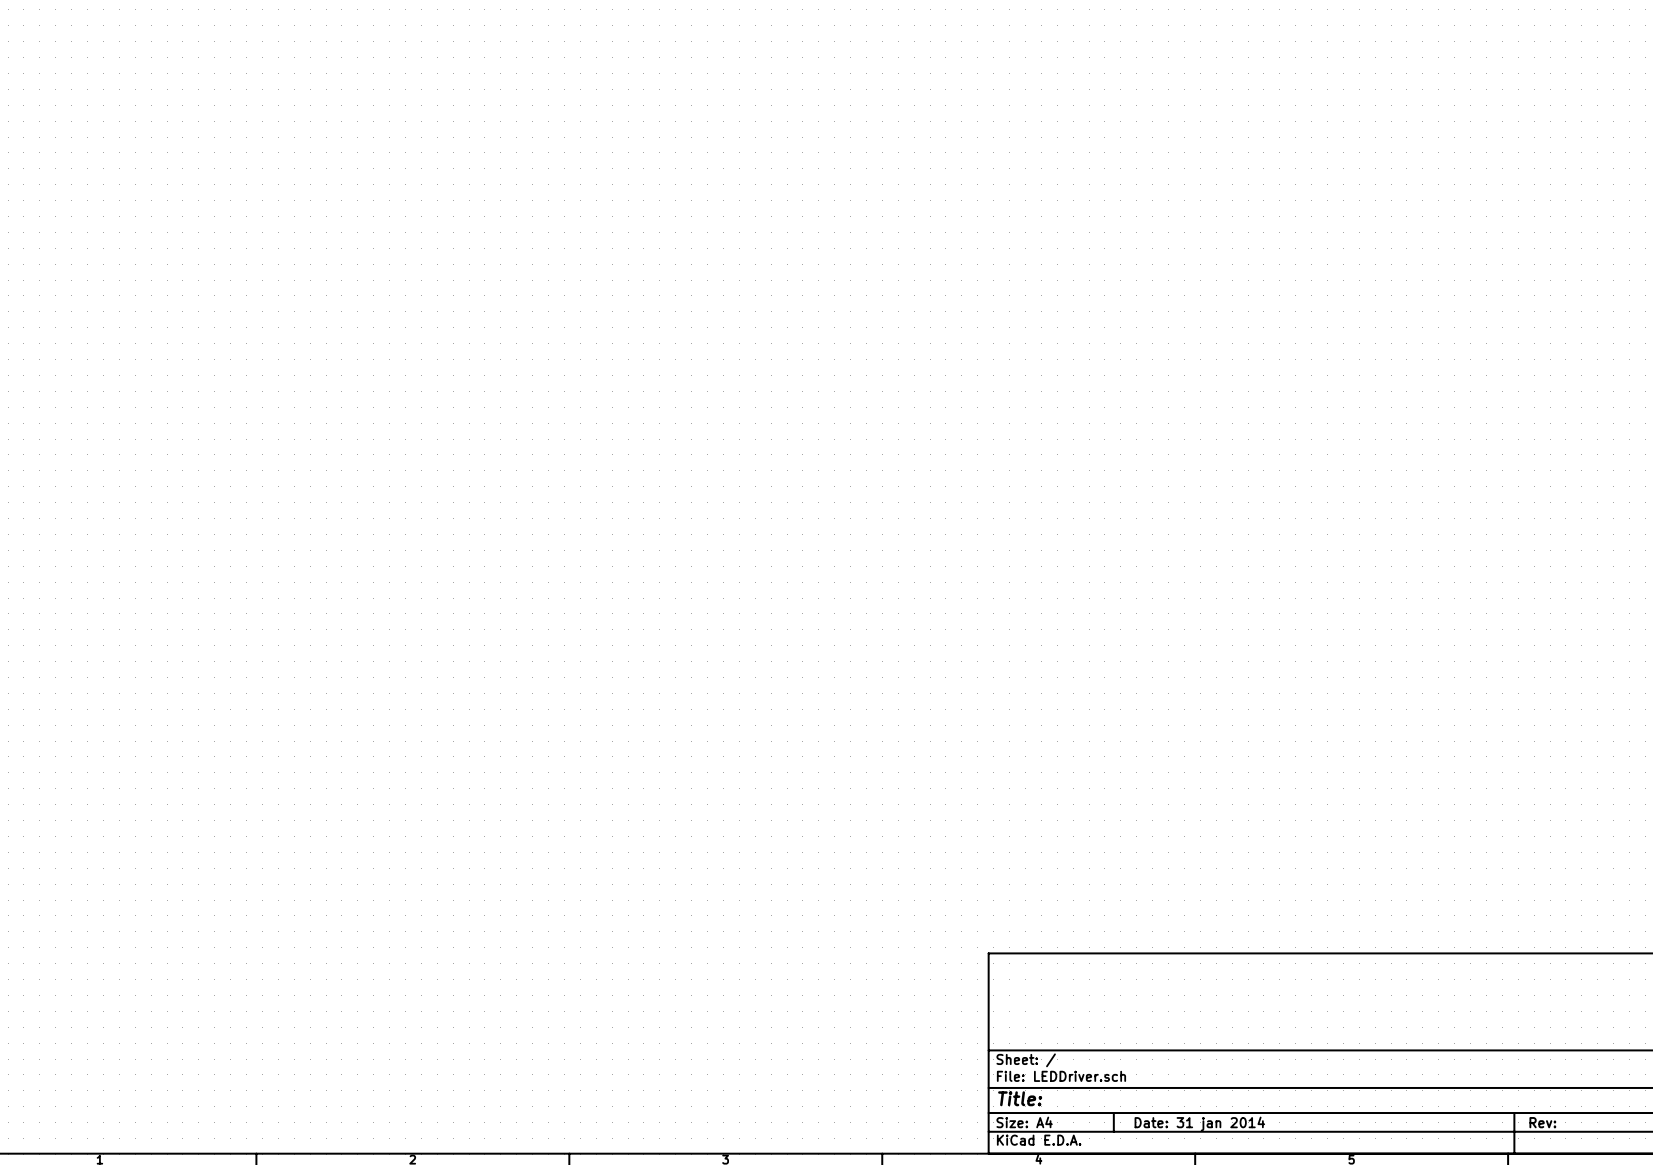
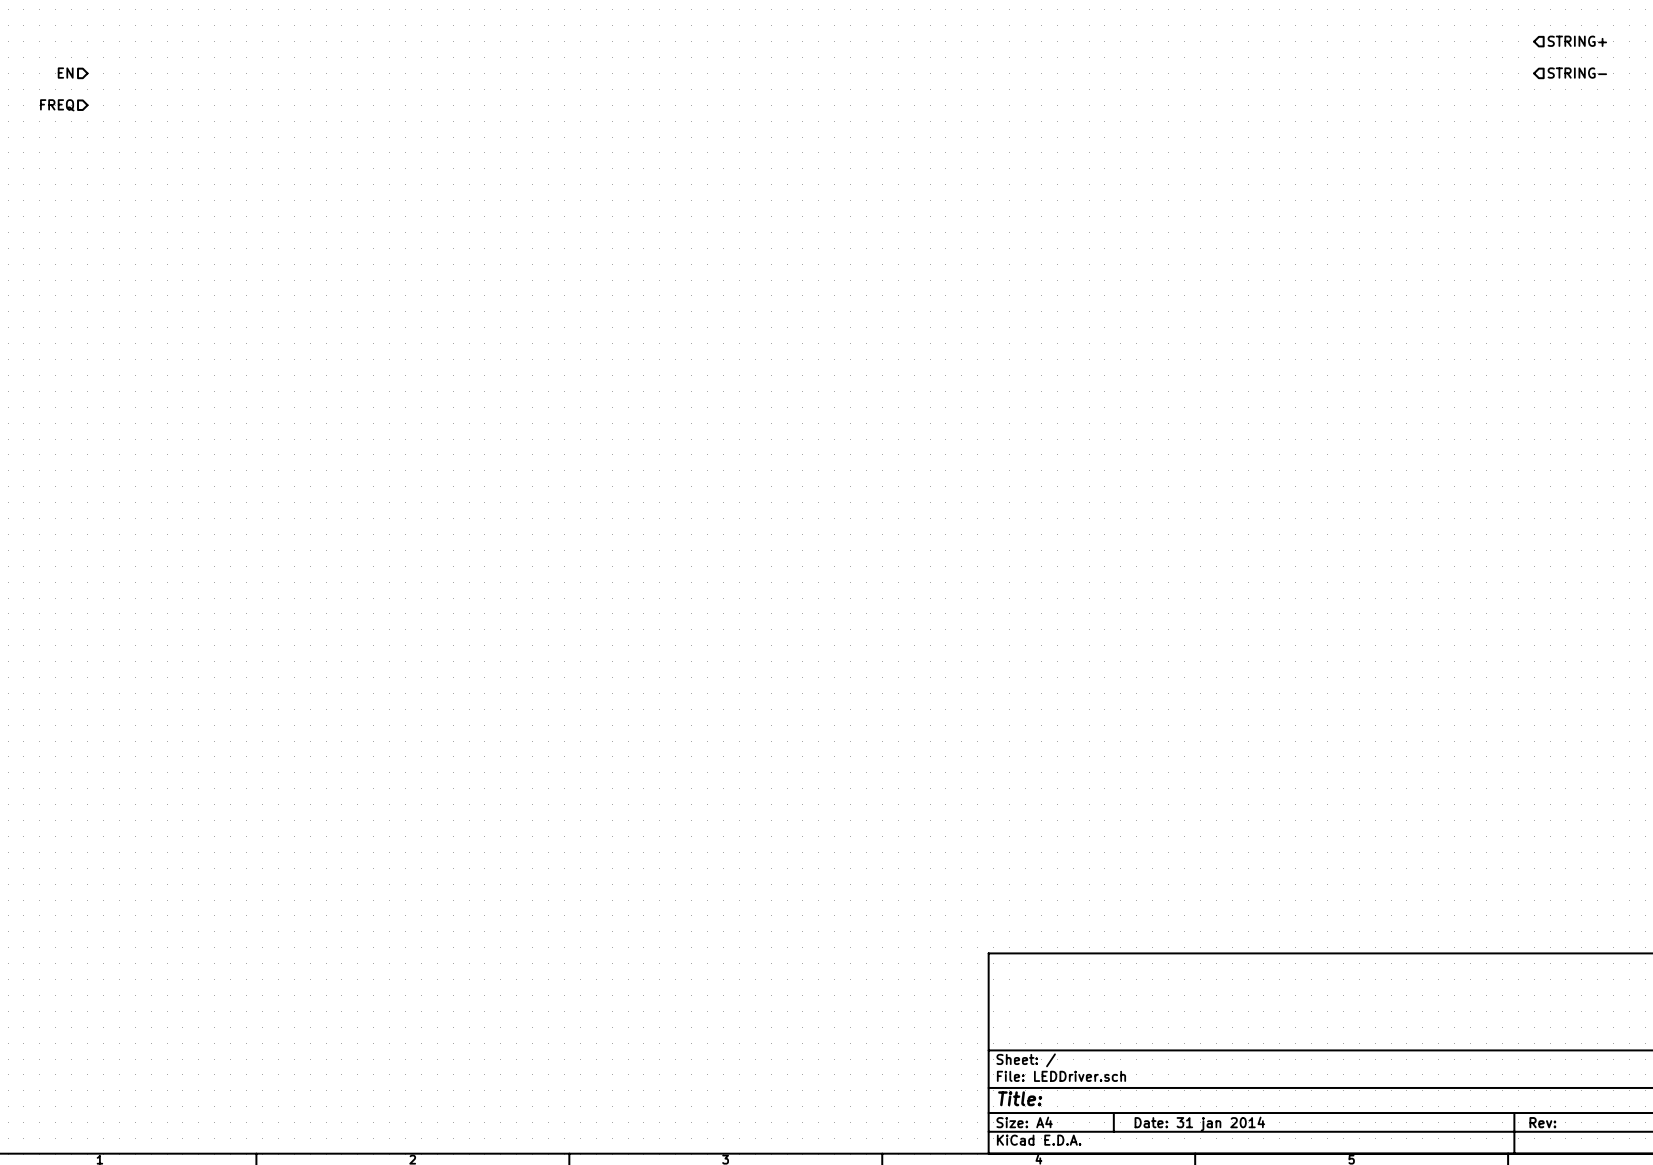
hierarchical label: none -> STRING+ (1577, 41)
hierarchical label: none -> EN (65, 73)
hierarchical label: none -> STRING- (1577, 73)
hierarchical label: none -> FREQ (57, 105)

